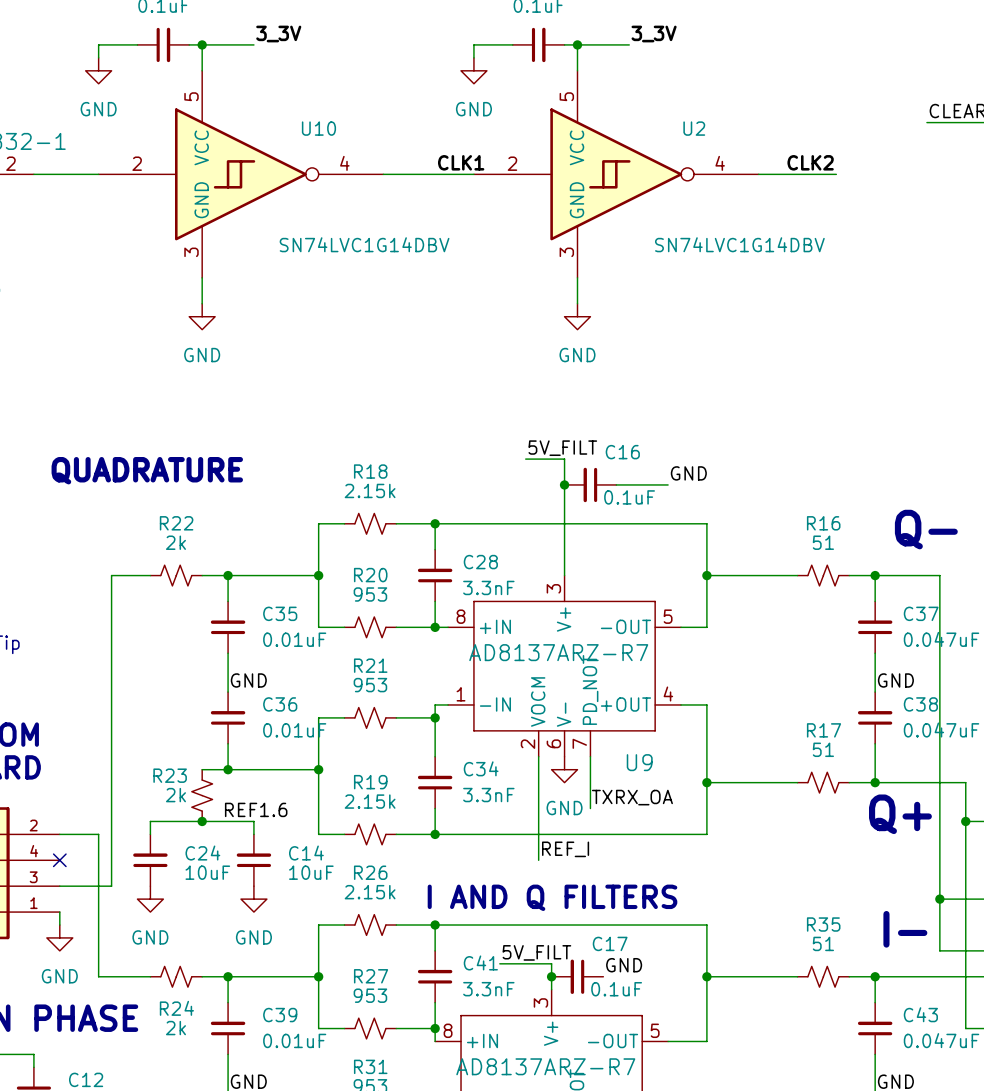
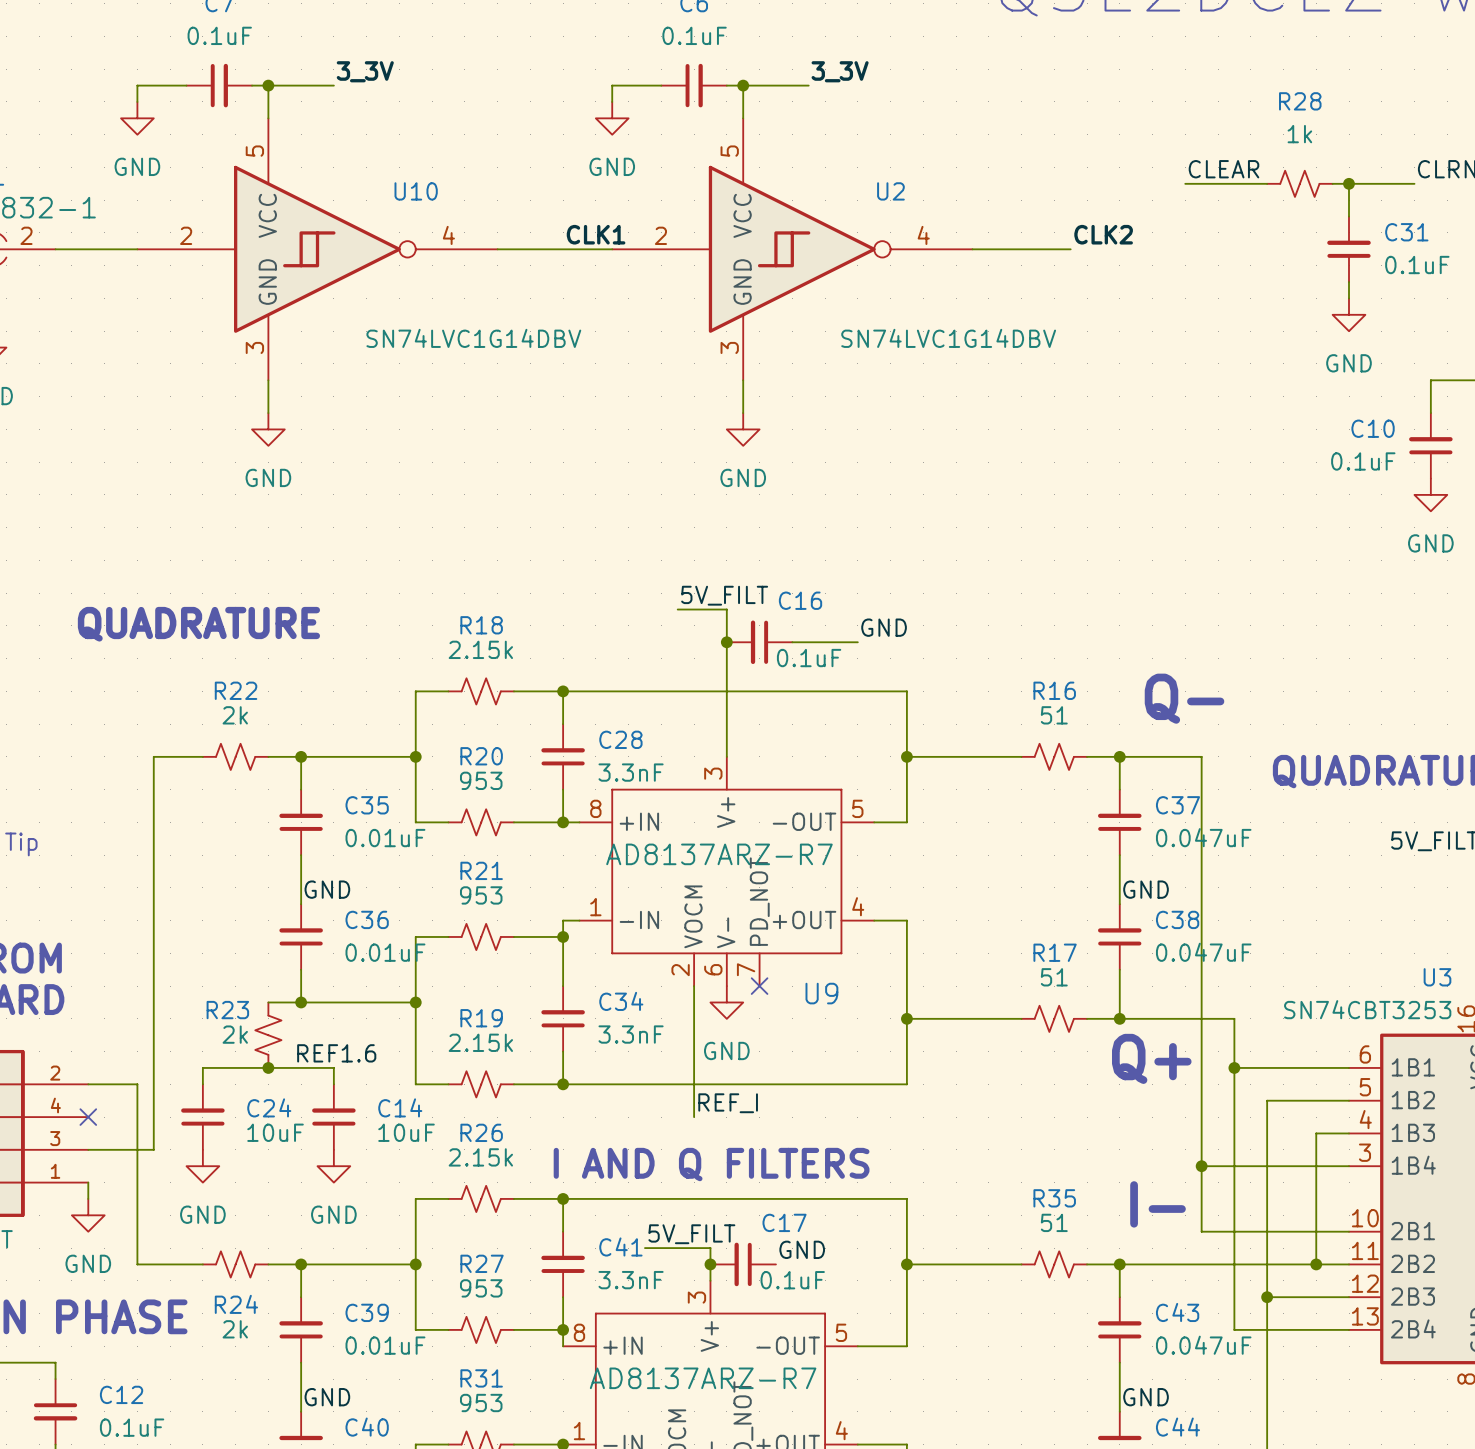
label position: CLK2 (810, 162) -> CLK2 (1103, 234)
wire: (590, 756) (590, 808) -> none
no-connect mark: none -> (759, 986)
label: TXRX_OA (632, 797) -> none

